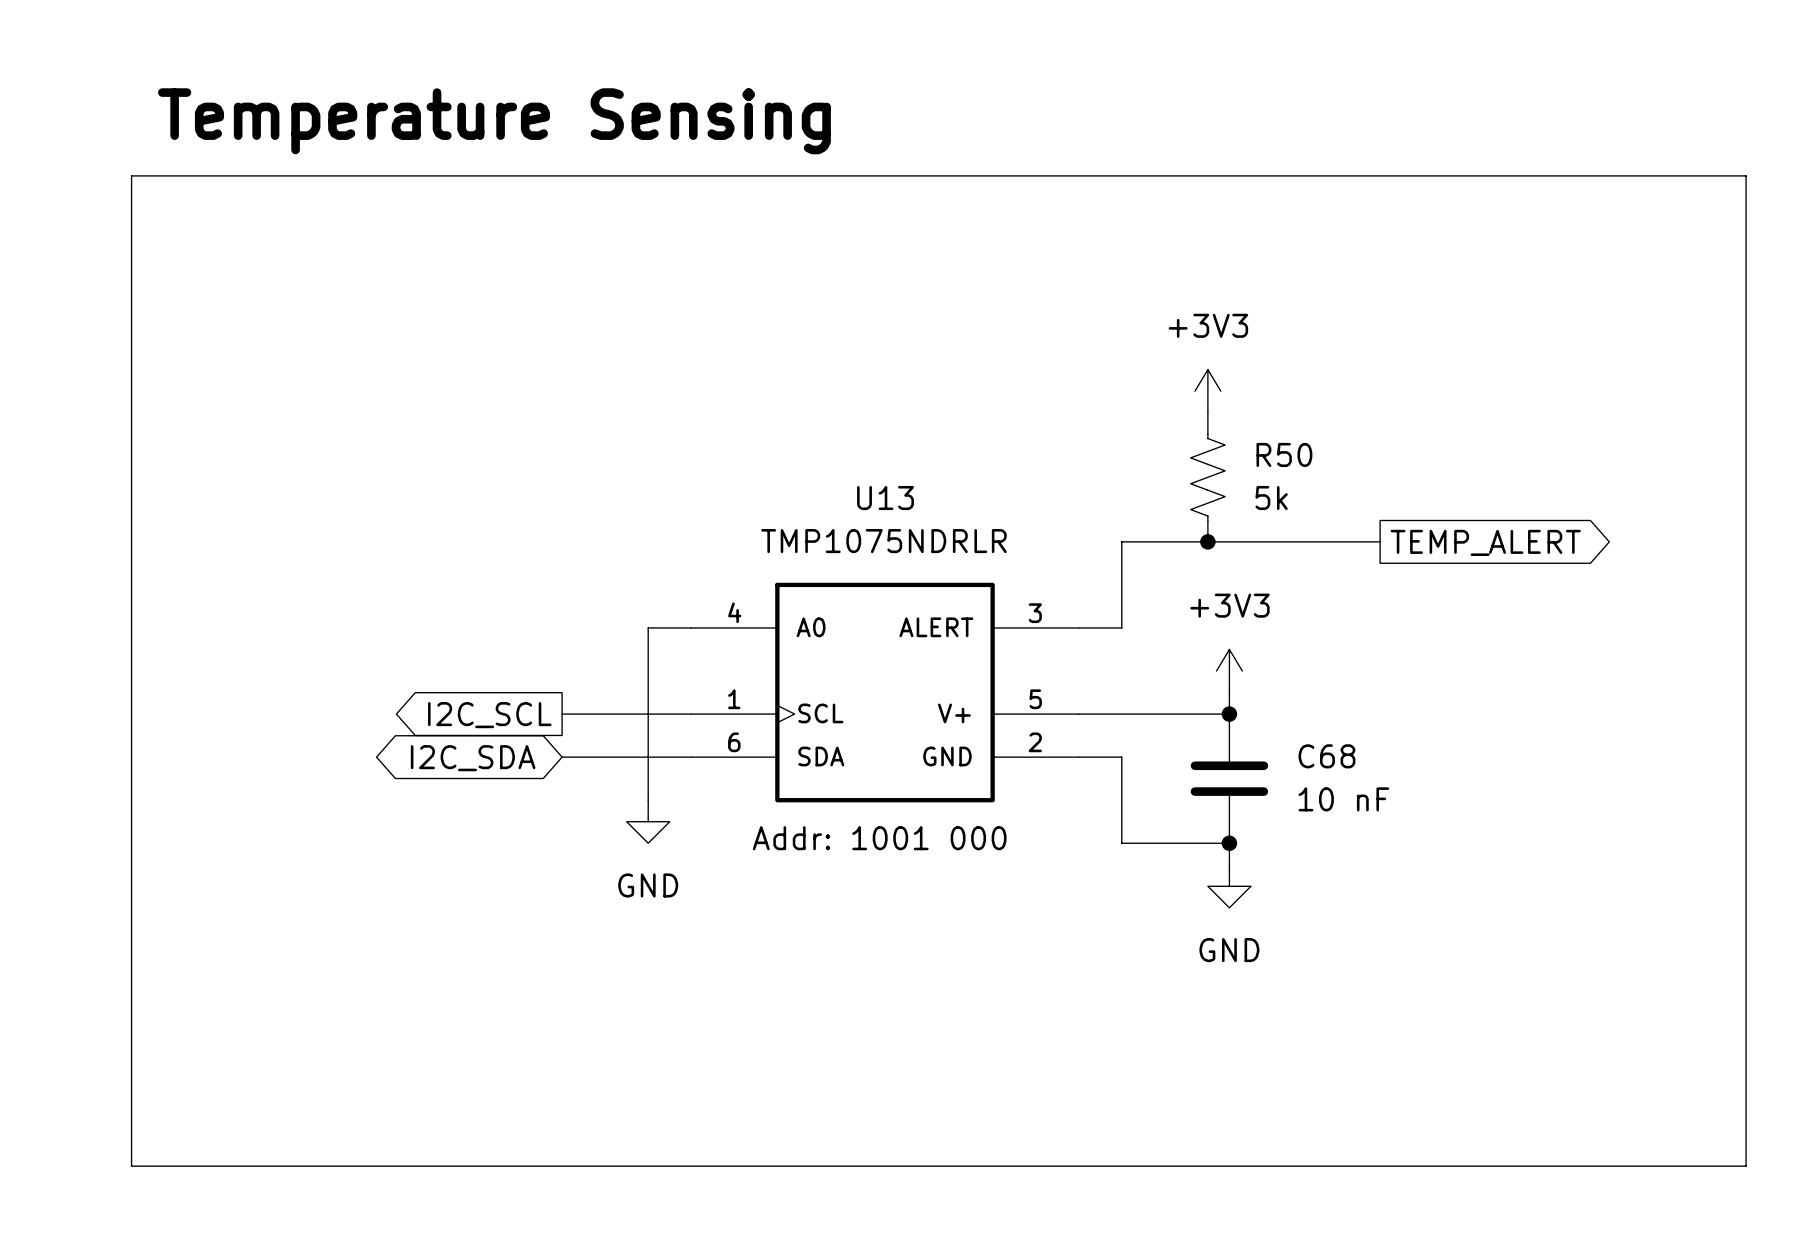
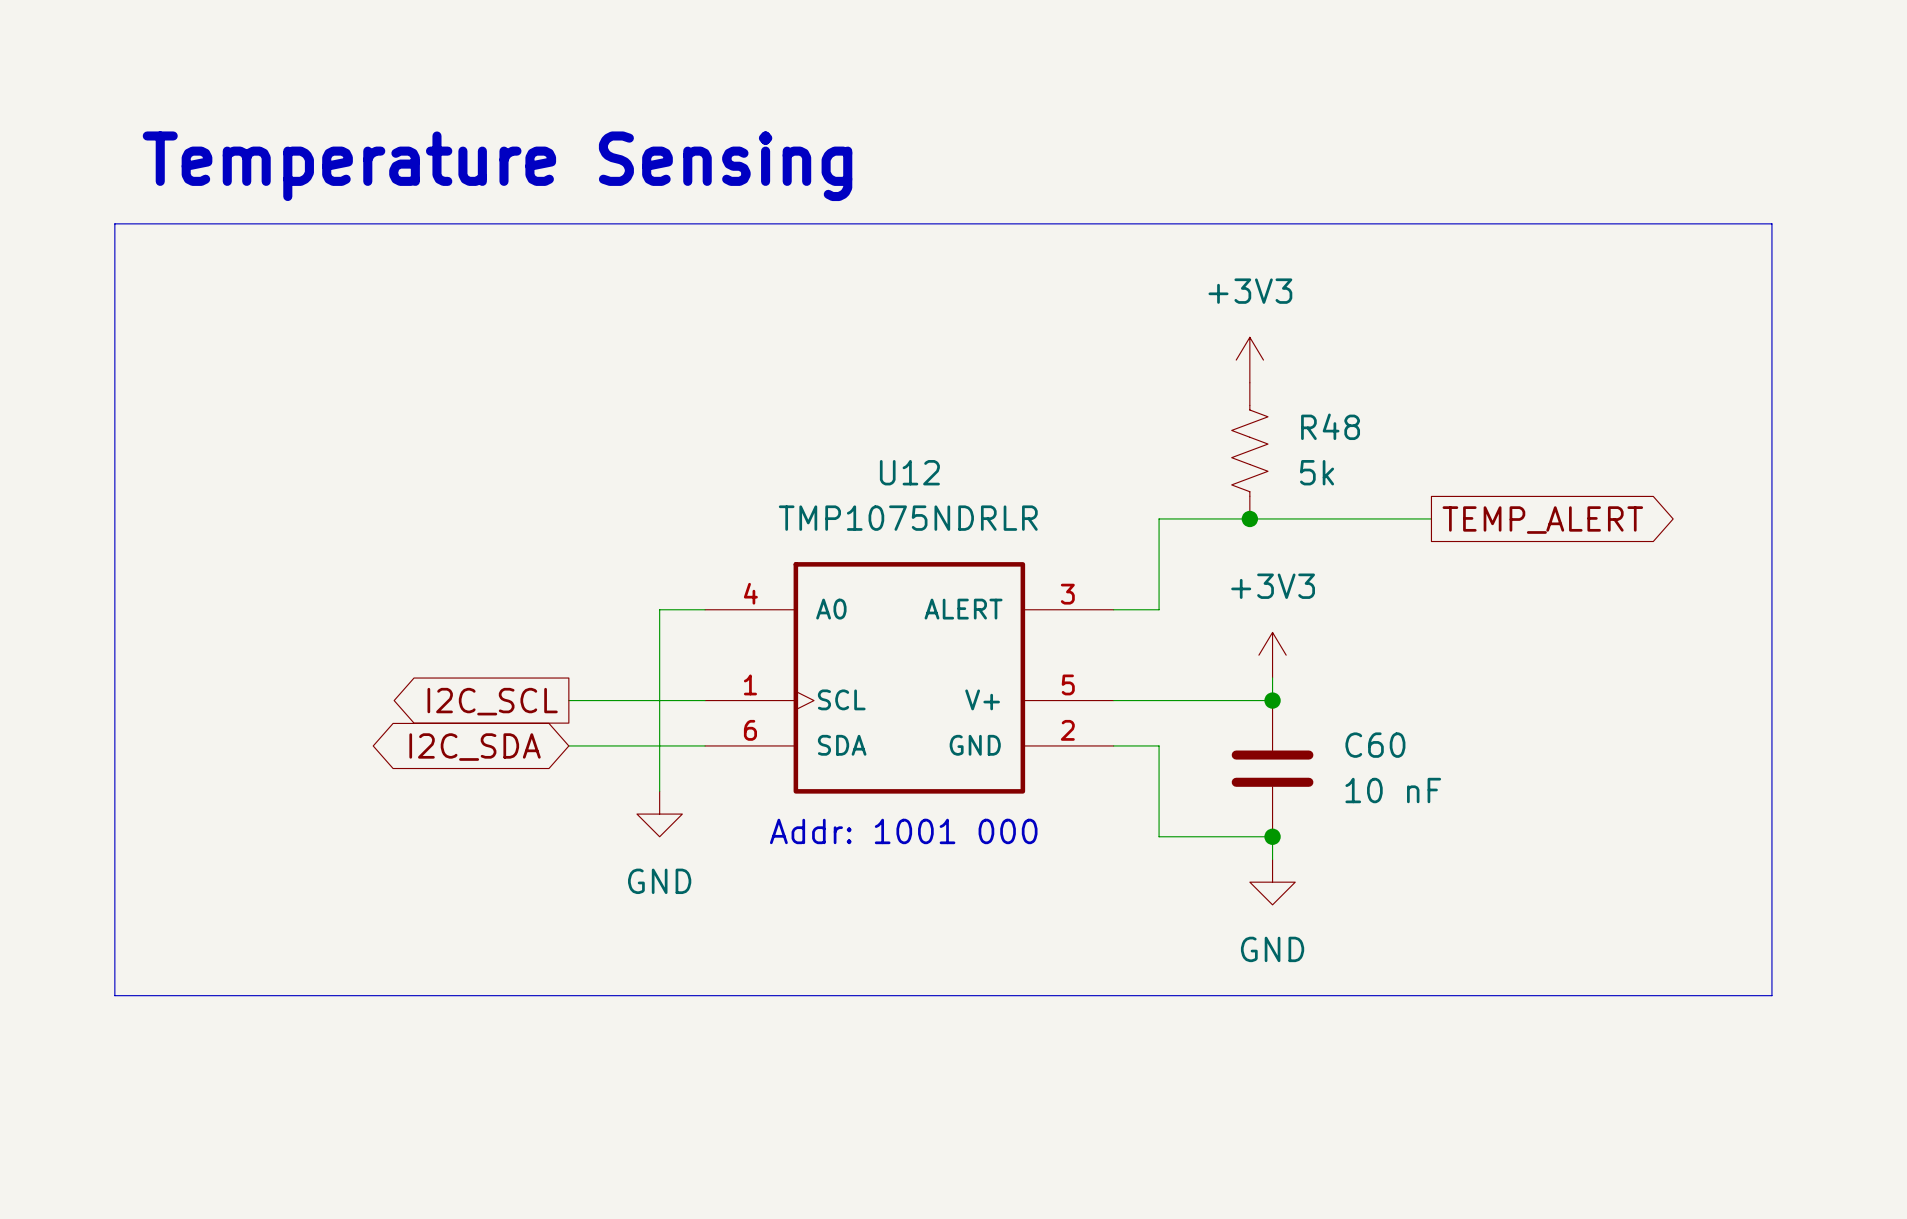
text position: Temperature Sensing (494, 121) -> Temperature Sensing (497, 166)
line: (131, 262) (131, 175) (1746, 175) (1746, 1166) (131, 1166) (131, 993) -> (114, 223) (1771, 223) (1771, 995) (114, 995)
R50 name: R50 (1284, 454) -> R48 (1330, 426)
U13 name: U13 (885, 498) -> U12 (909, 472)
C68 name: C68 (1326, 756) -> C60 (1375, 745)

